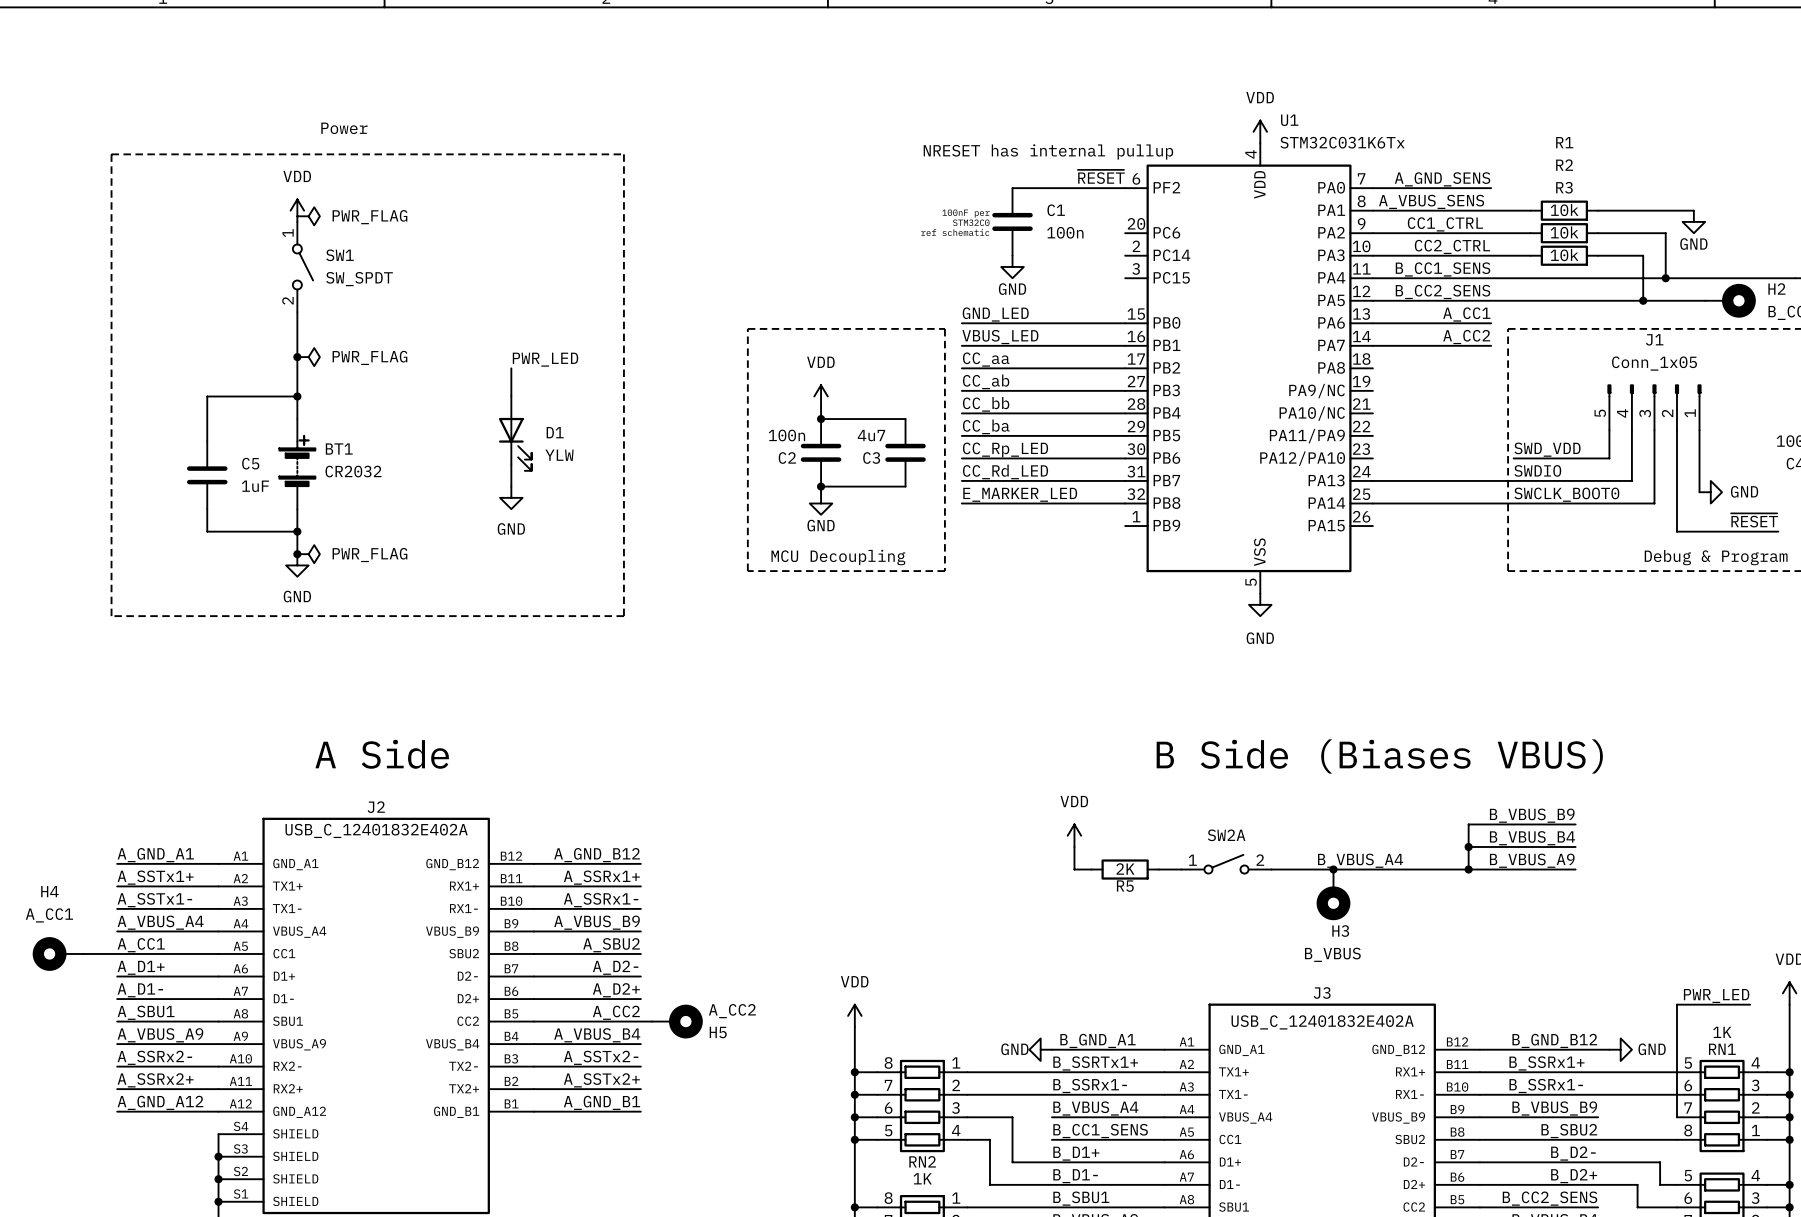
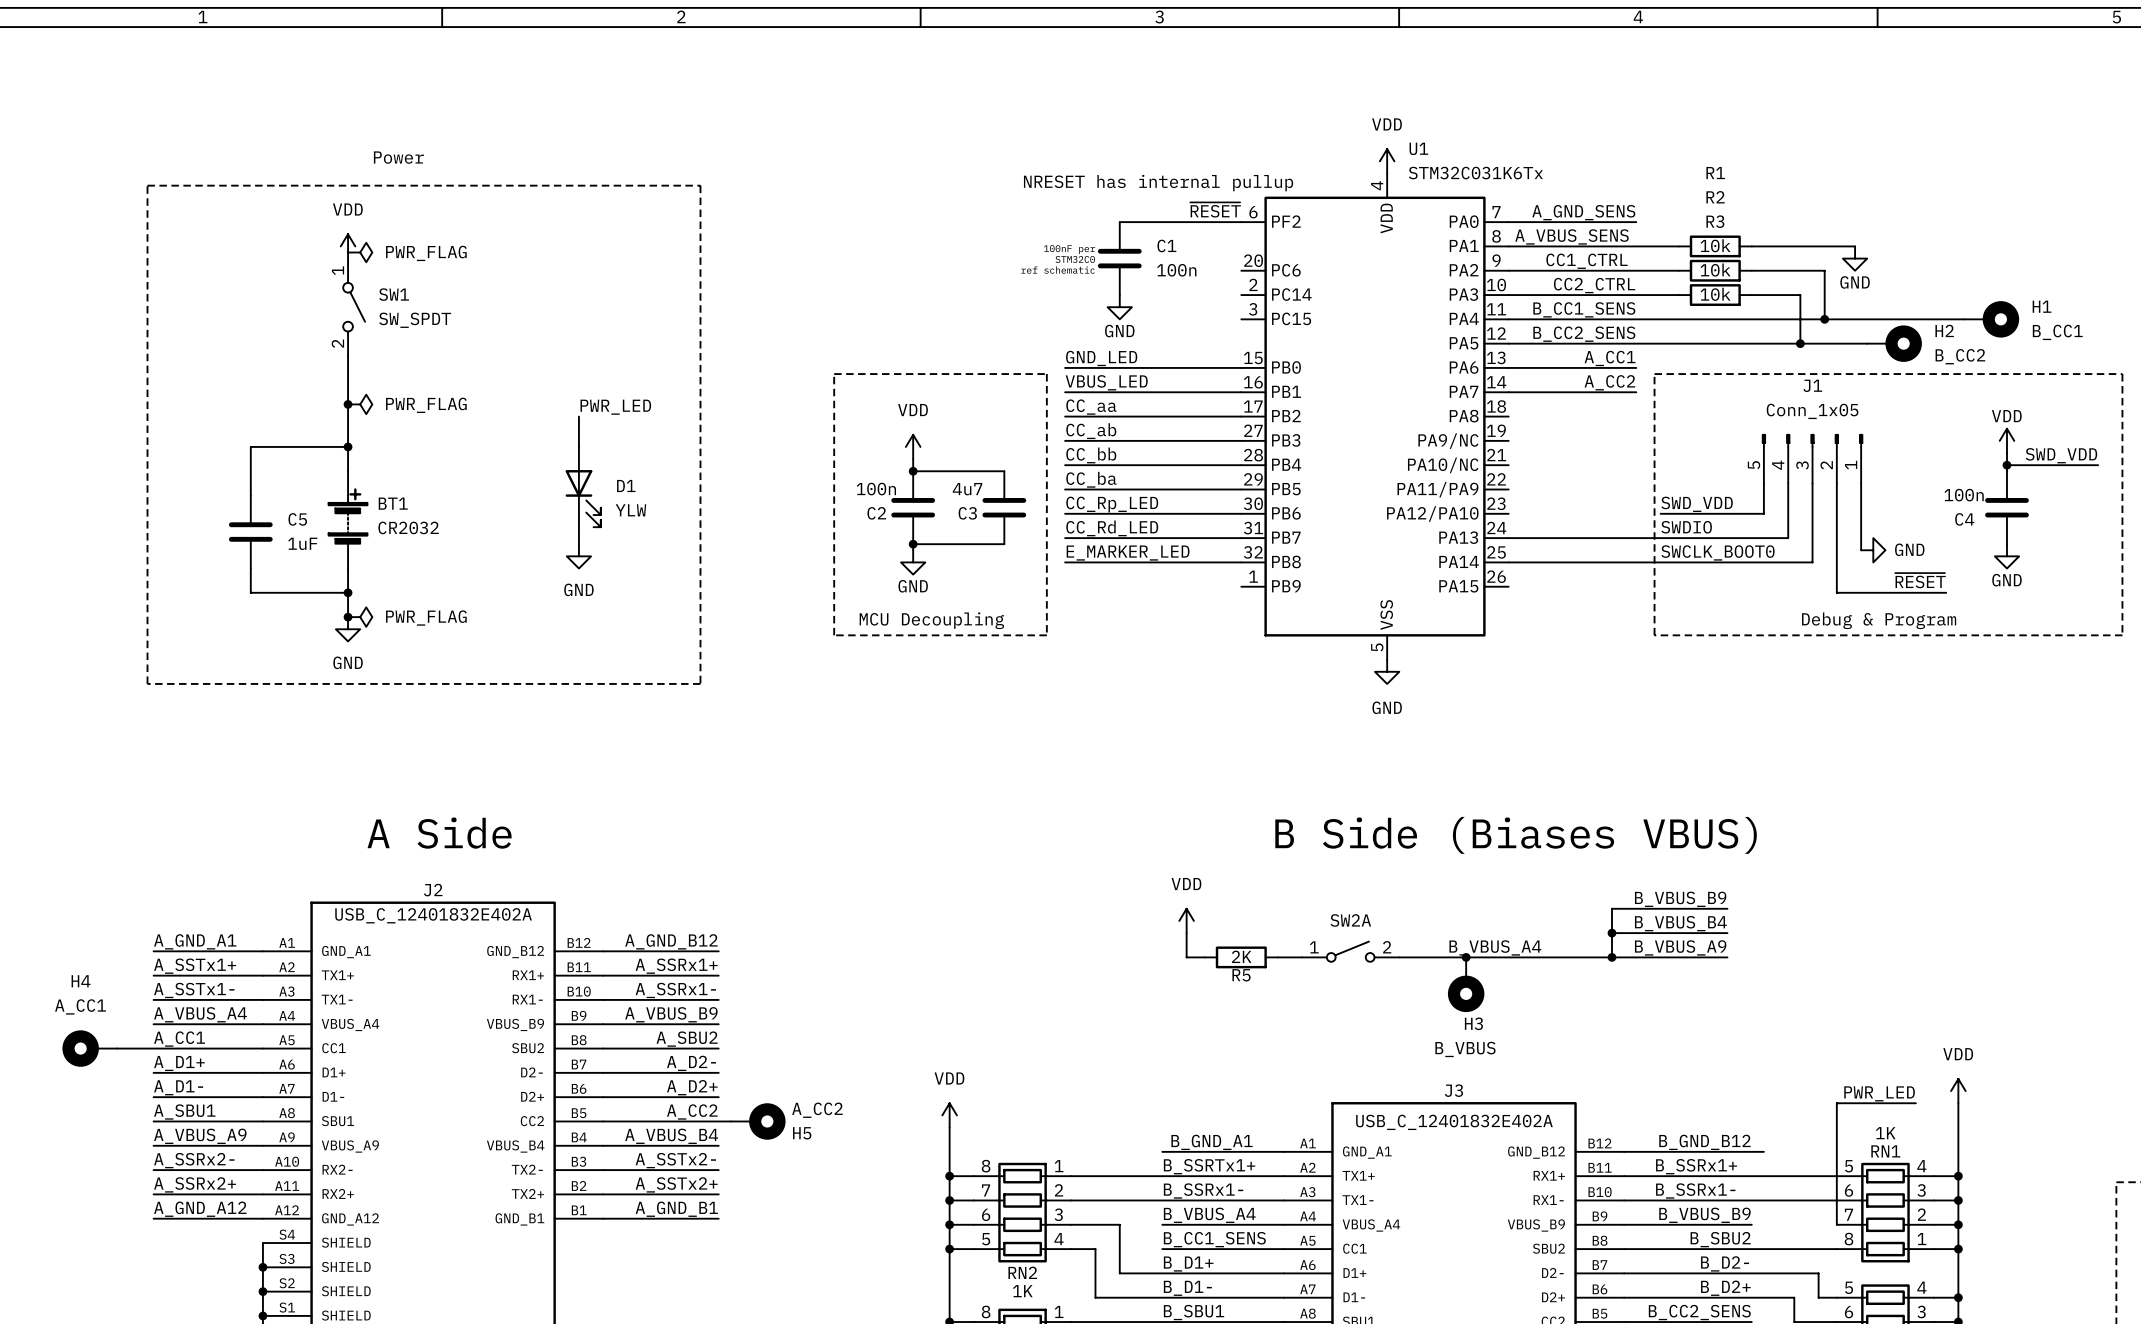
power symbol: GND (1040, 1049) -> none
power symbol: GND (1620, 1049) -> none

